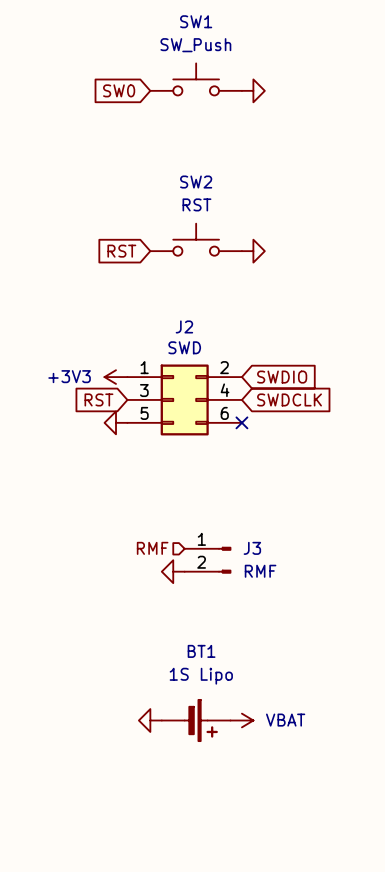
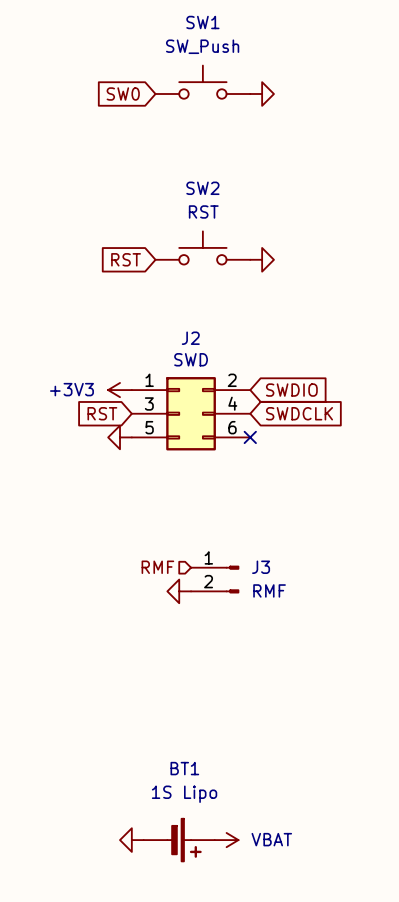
power symbol position: (150, 720) -> (131, 840)
BT1 position: (196, 720) -> (179, 840)
power symbol position: VBAT (241, 720) -> VBAT (226, 840)

